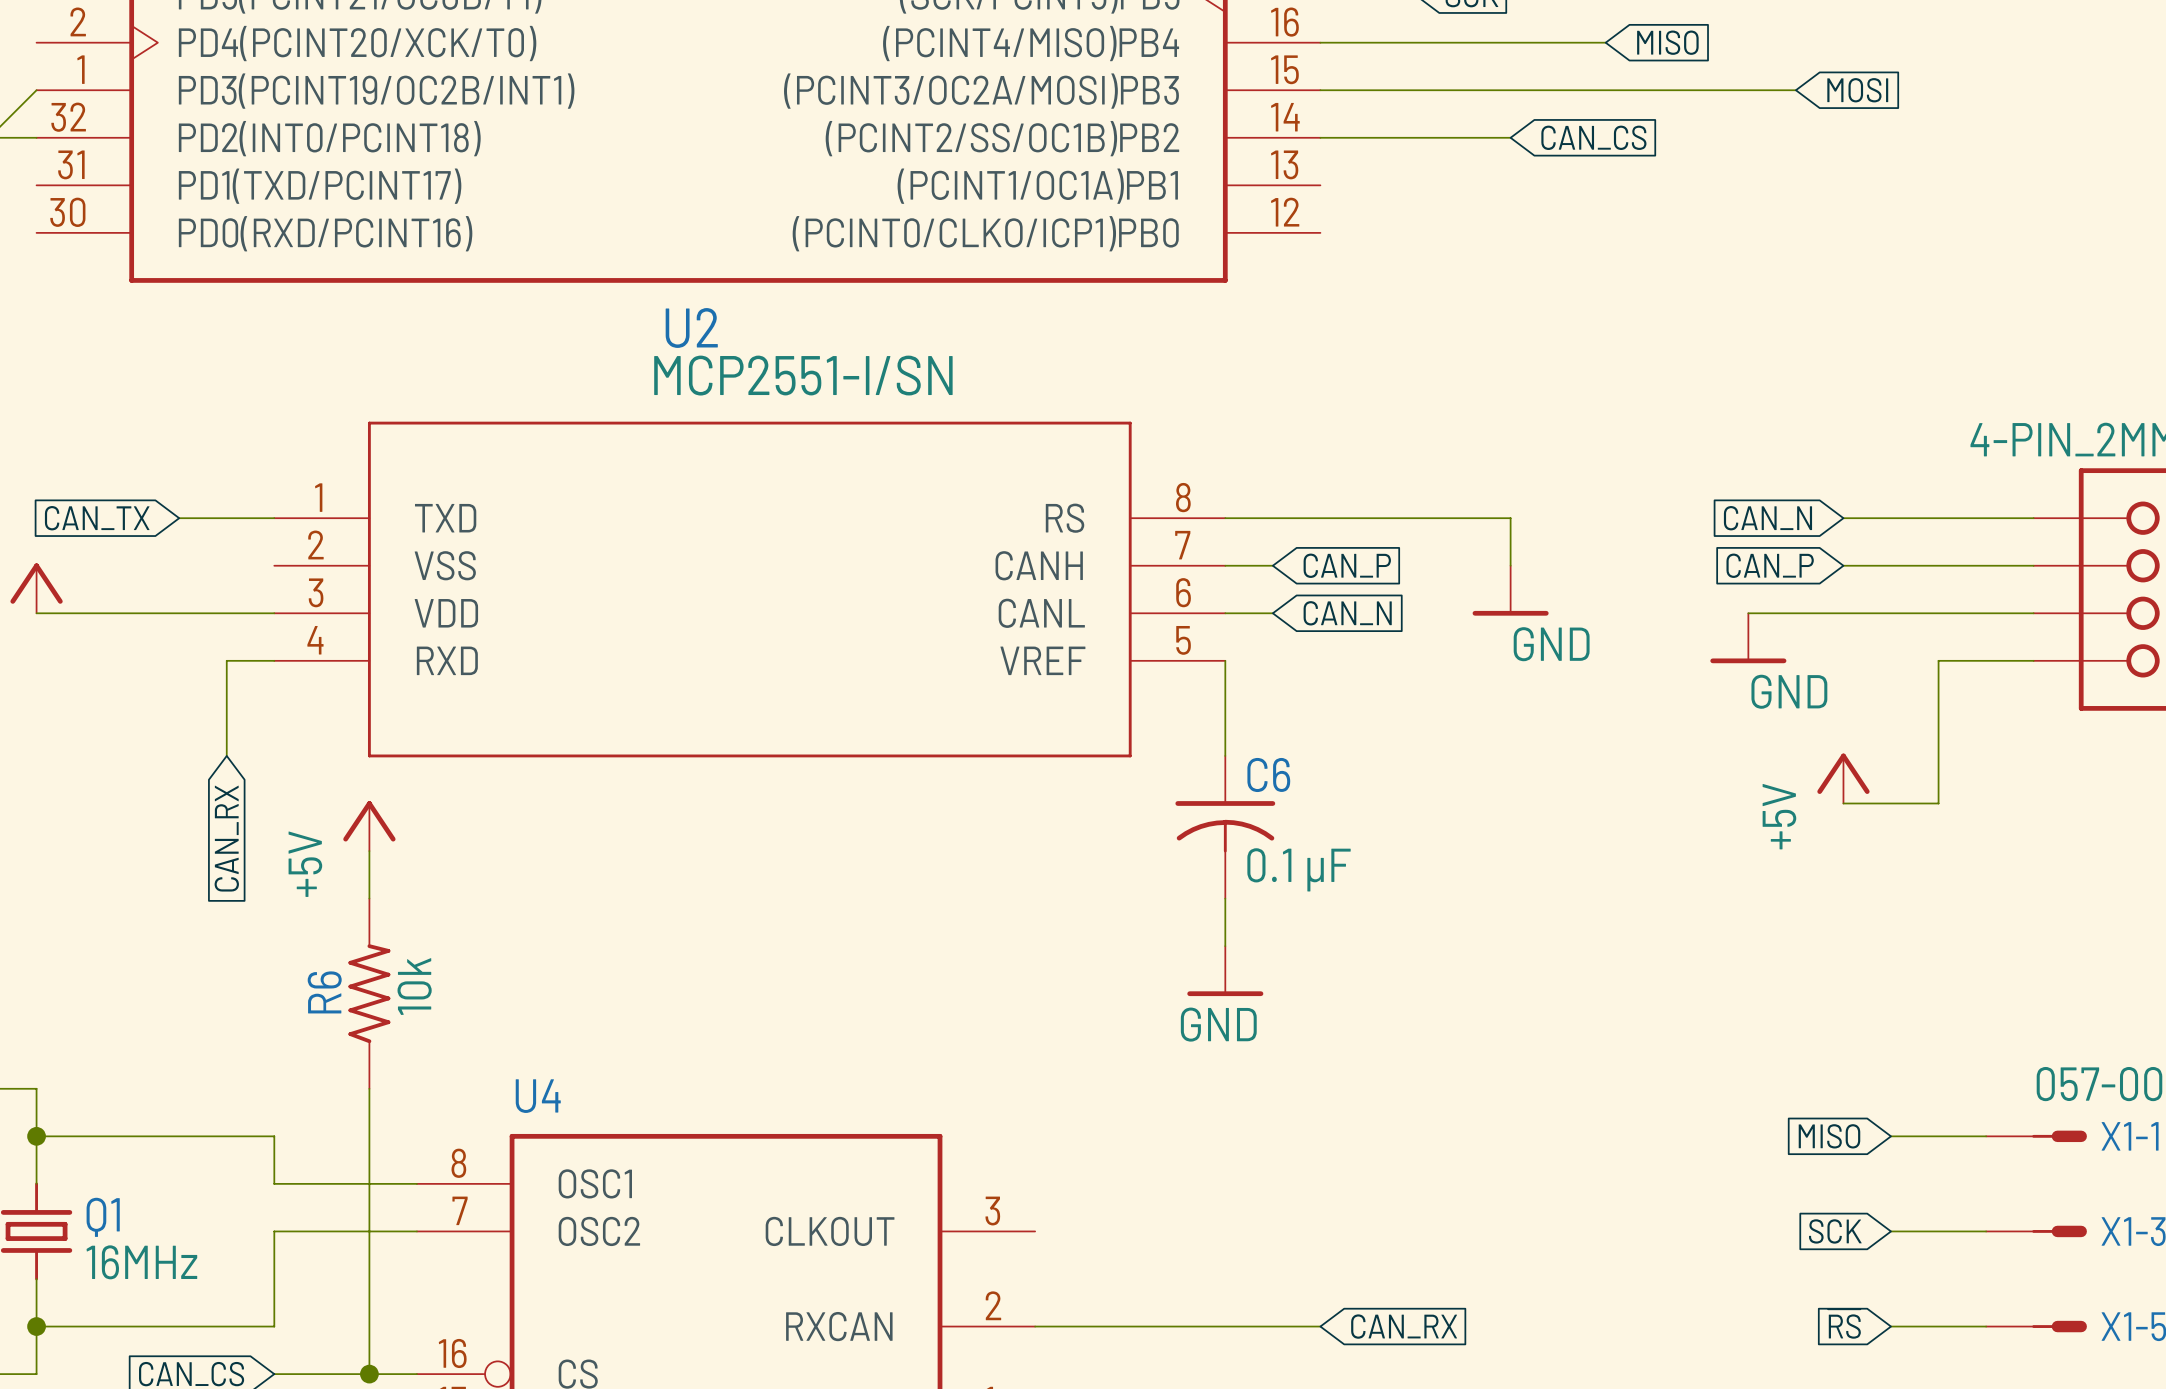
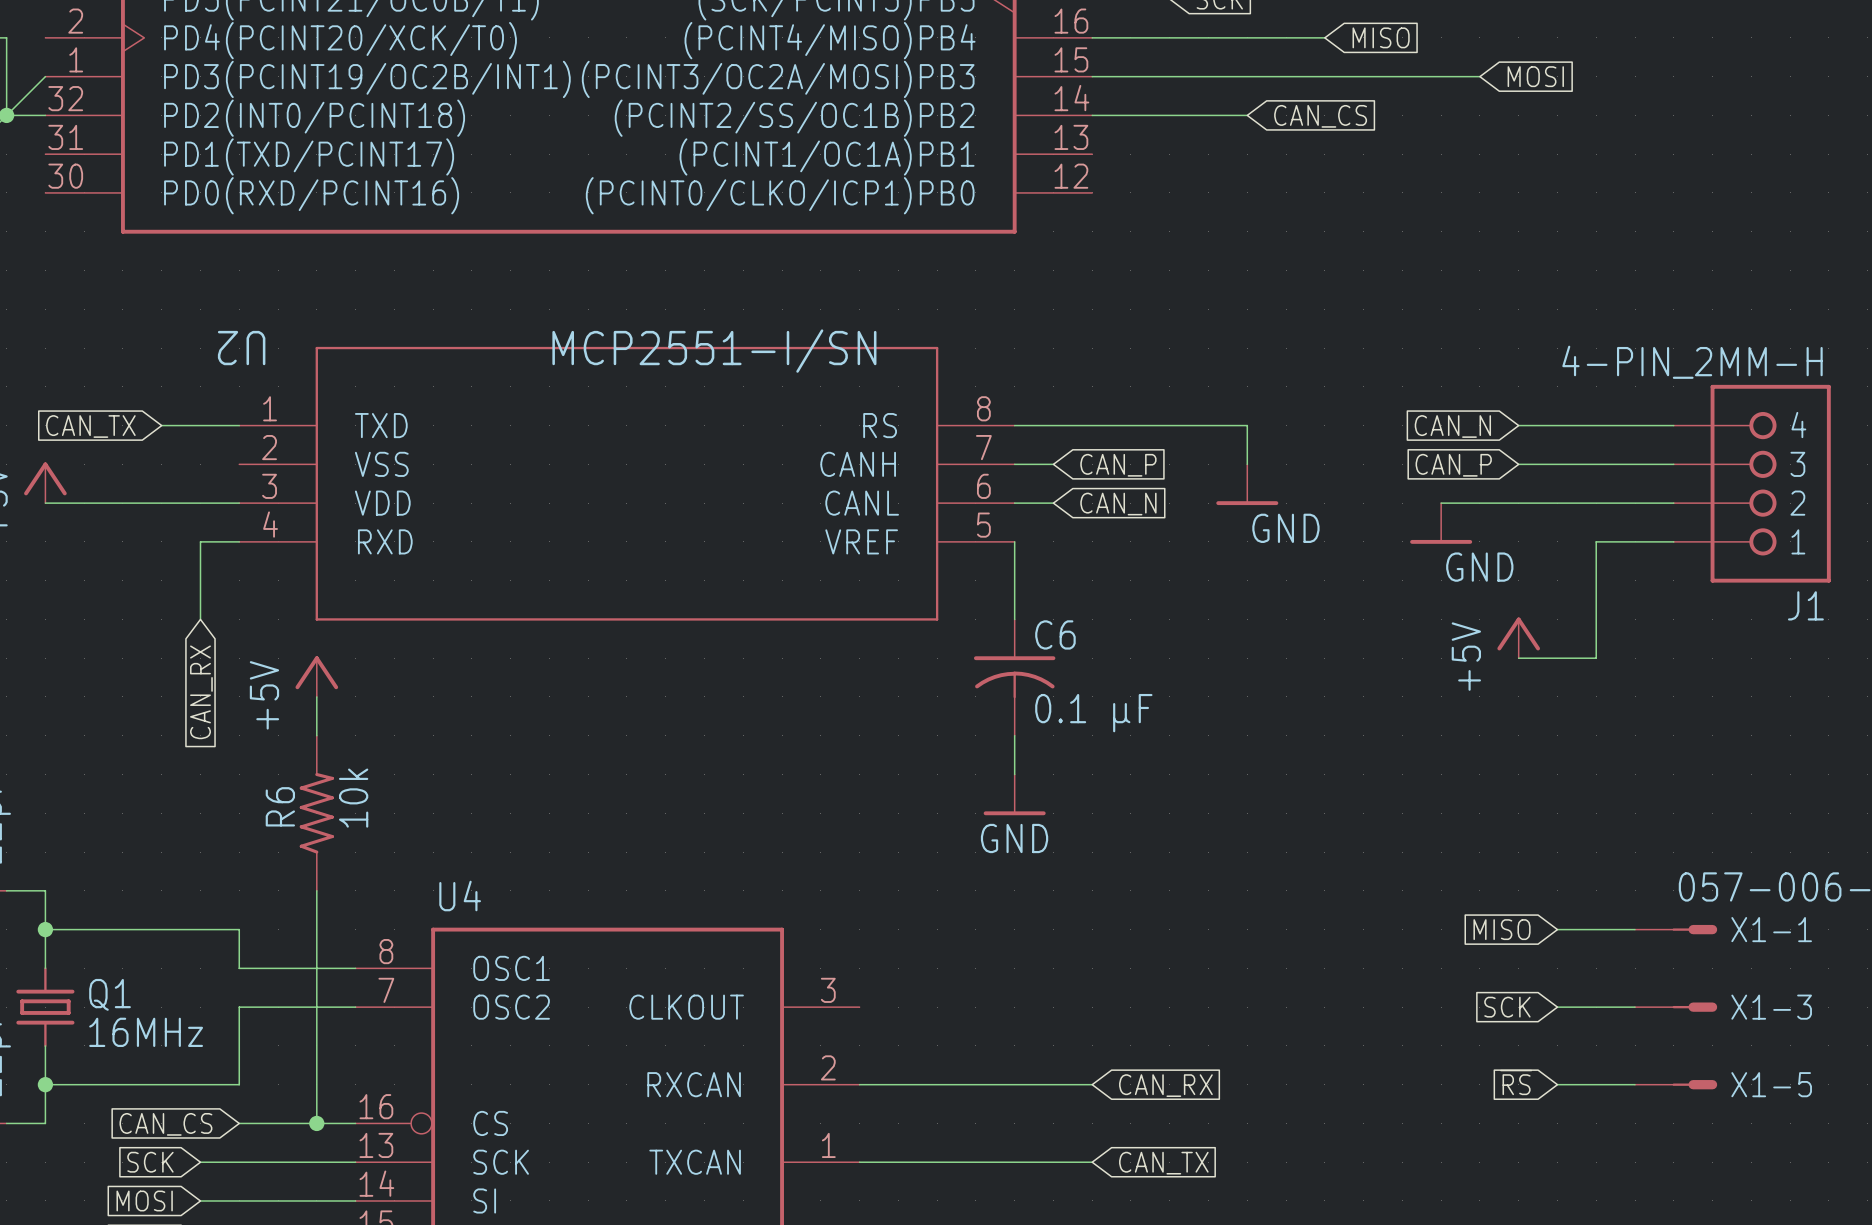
U2 name rotation: 0° (691, 327) -> 180° (241, 348)
U2 name position: U2 (691, 327) -> U2 (241, 348)
U2 value position: MCP2551-I/SN (803, 375) -> MCP2551-I/SN (714, 351)

